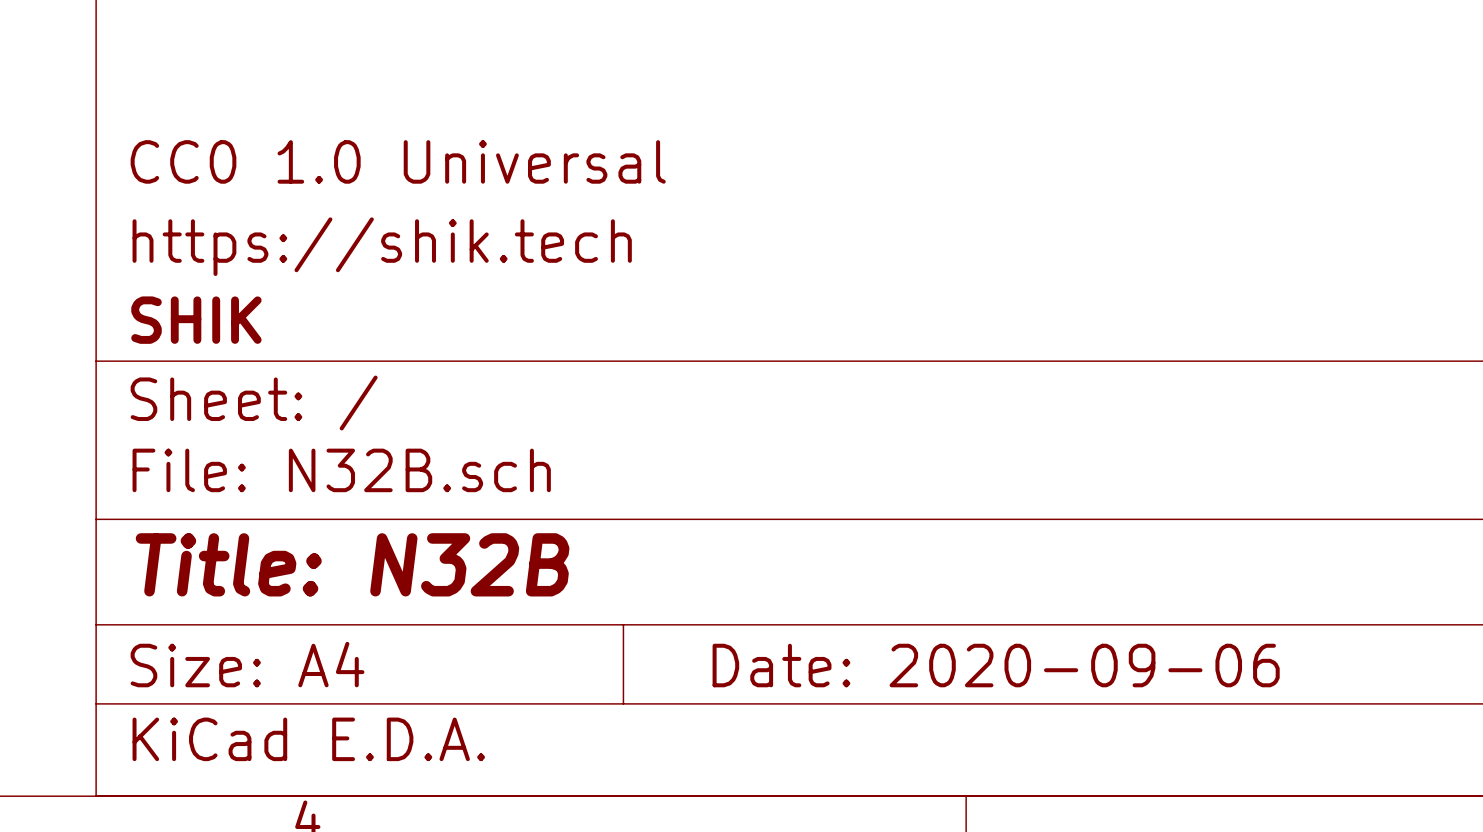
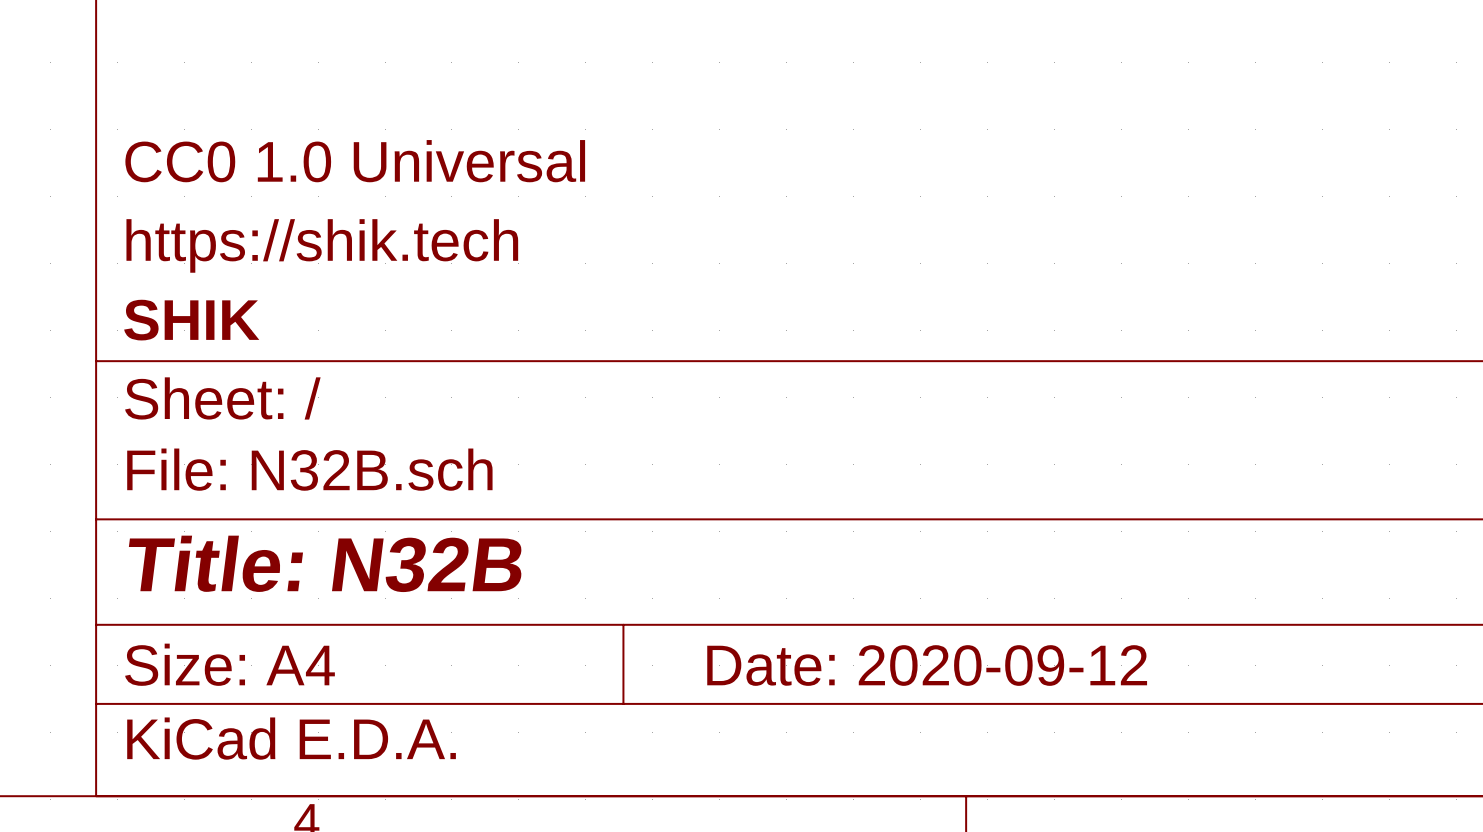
title block: Date: 2020-09-06 (996, 665) -> Date: 2020-09-12 (927, 665)

